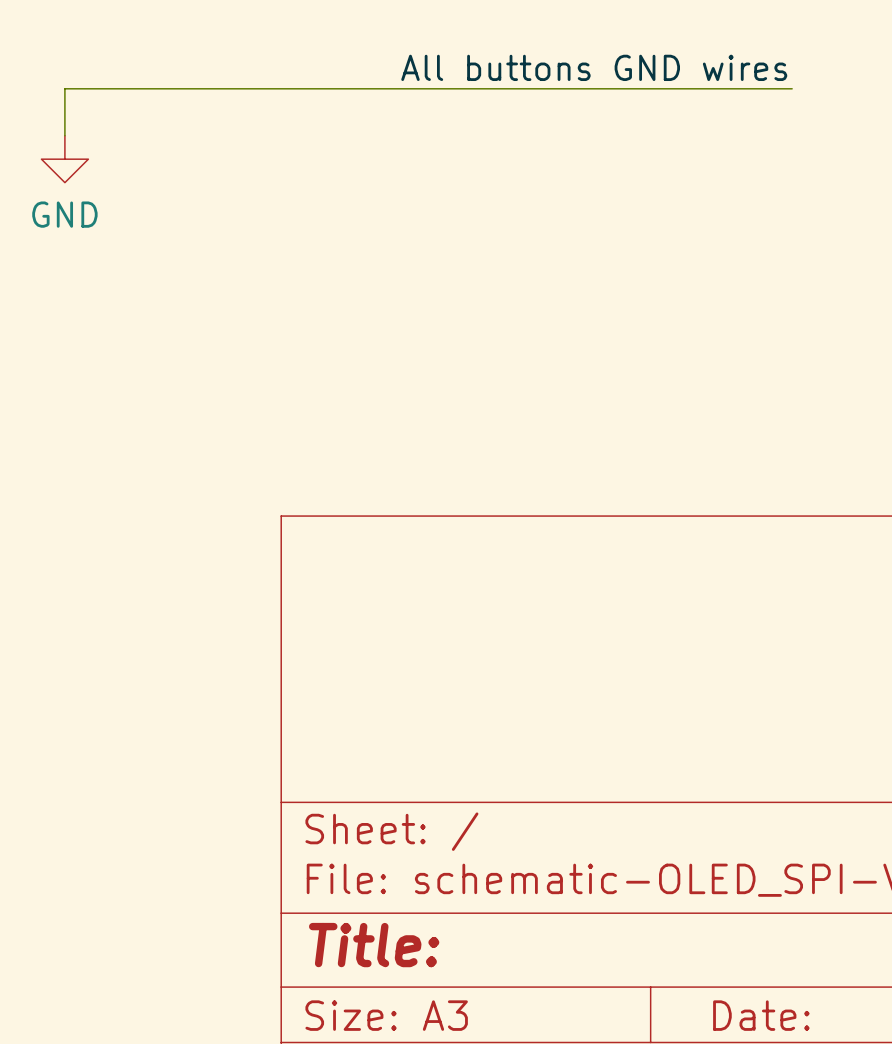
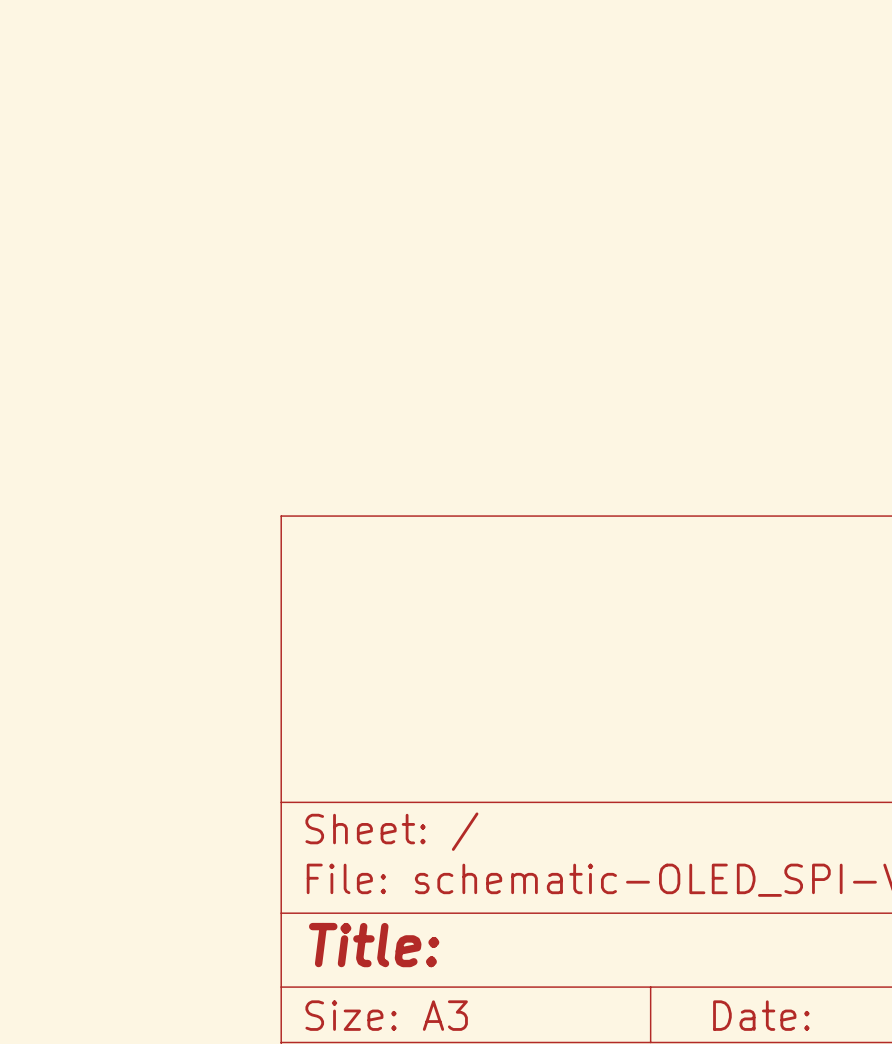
label: All buttons GND wires (594, 67) -> none
wire: (792, 88) (64, 88) (64, 135) -> none
power symbol: GND (64, 159) -> none

